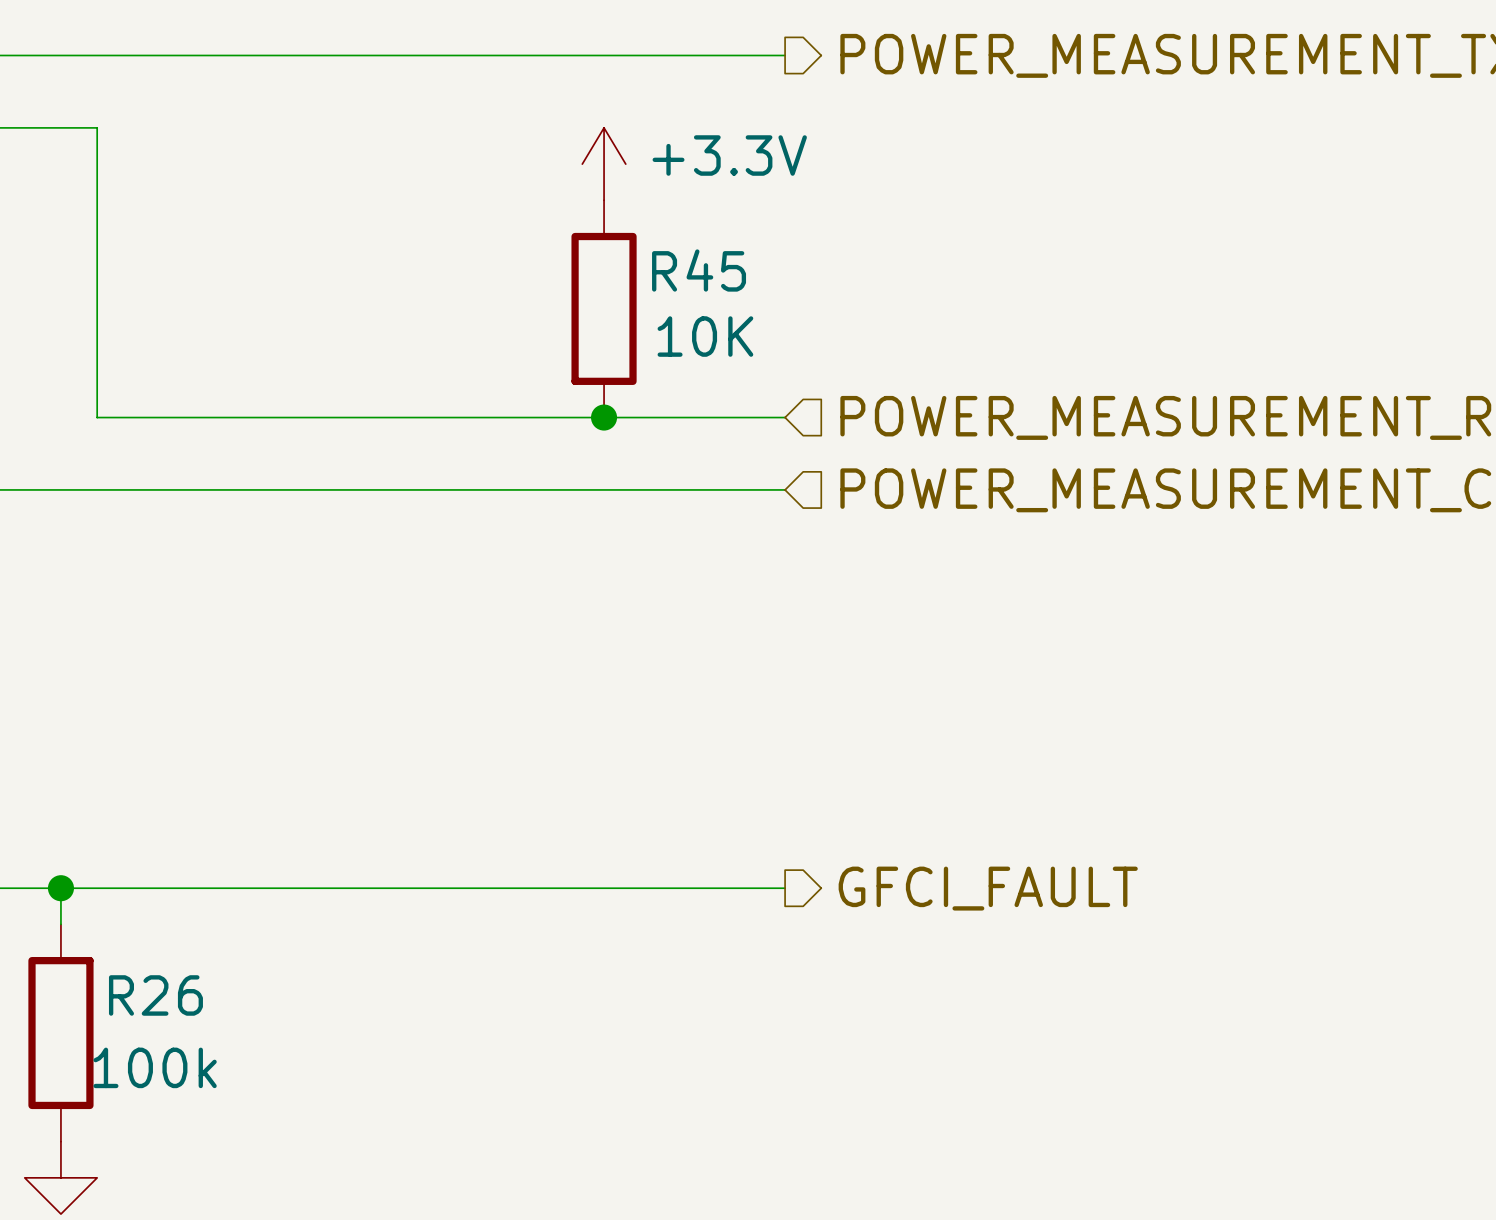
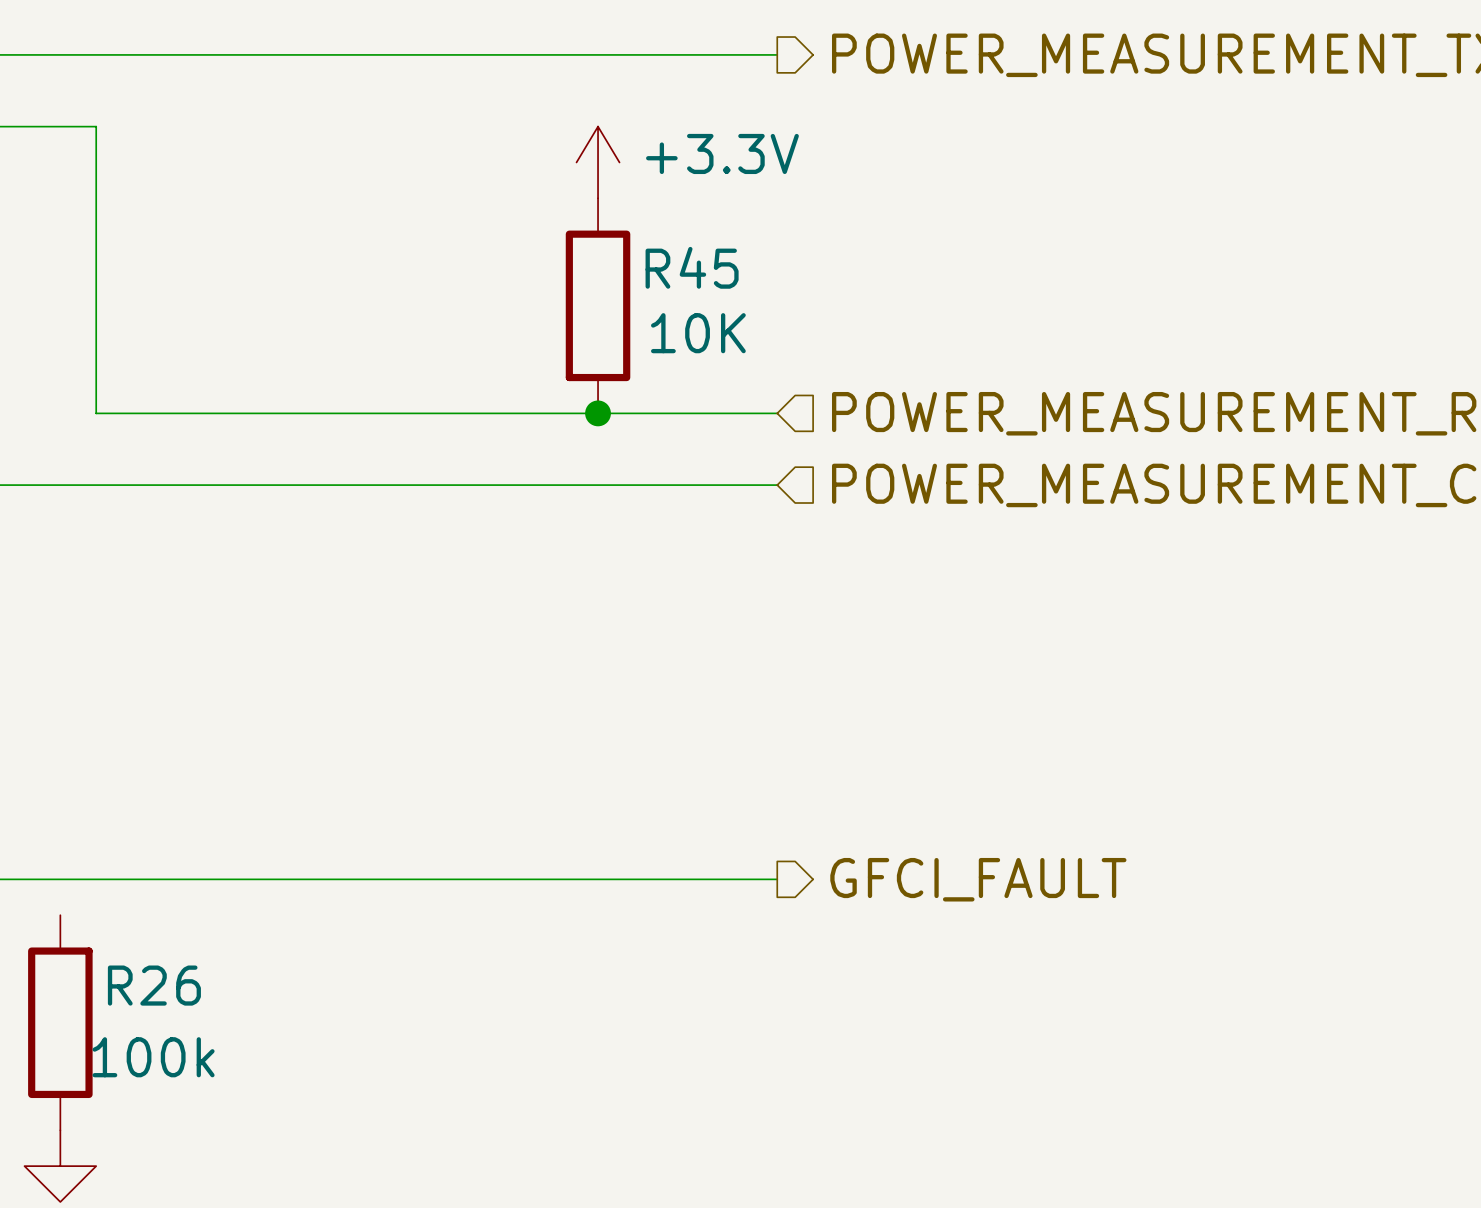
wire: (60, 888) (60, 924) -> none
junction: (60, 888) -> none

